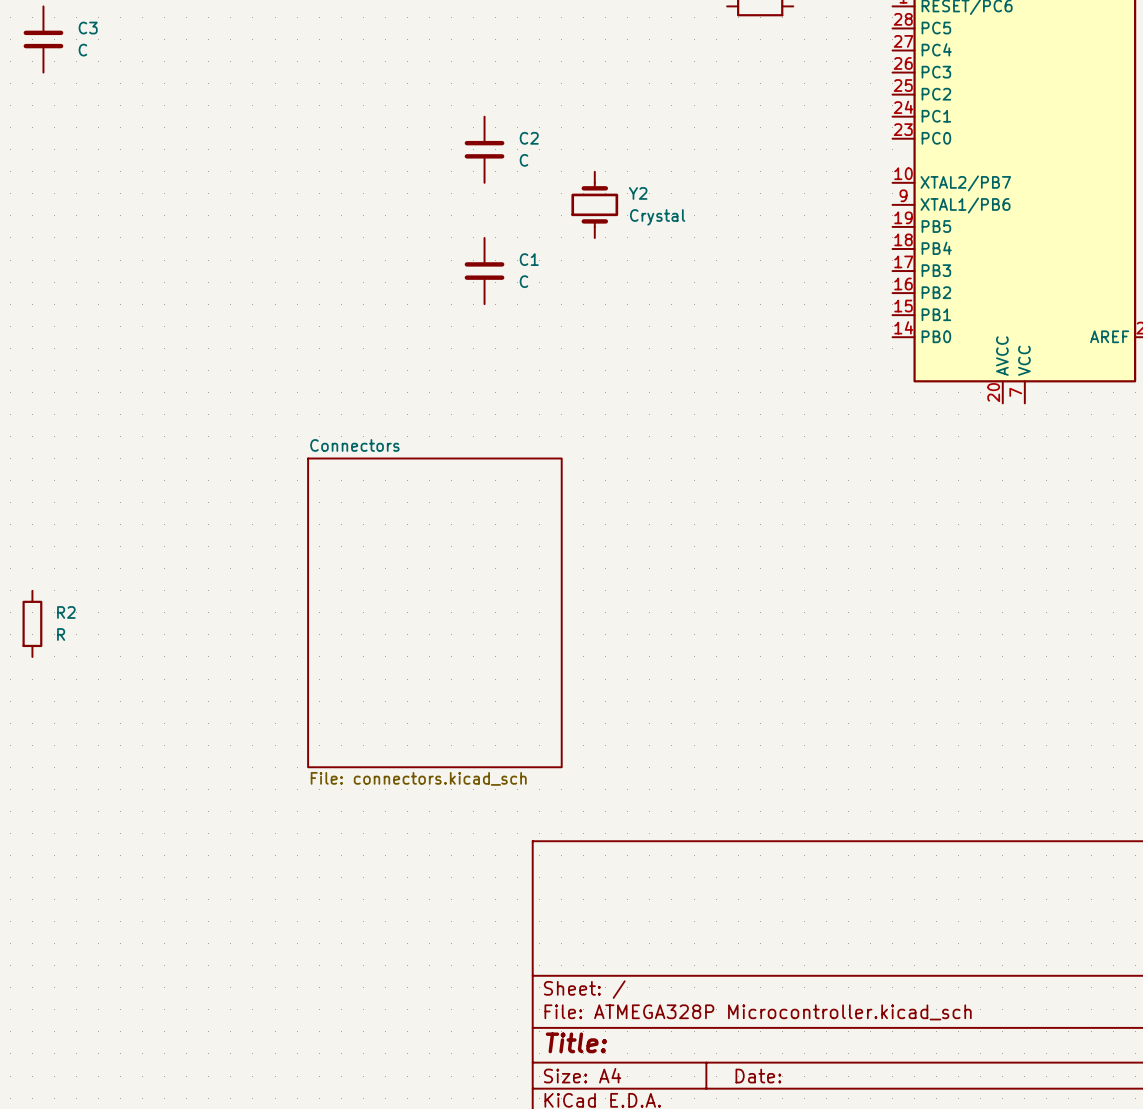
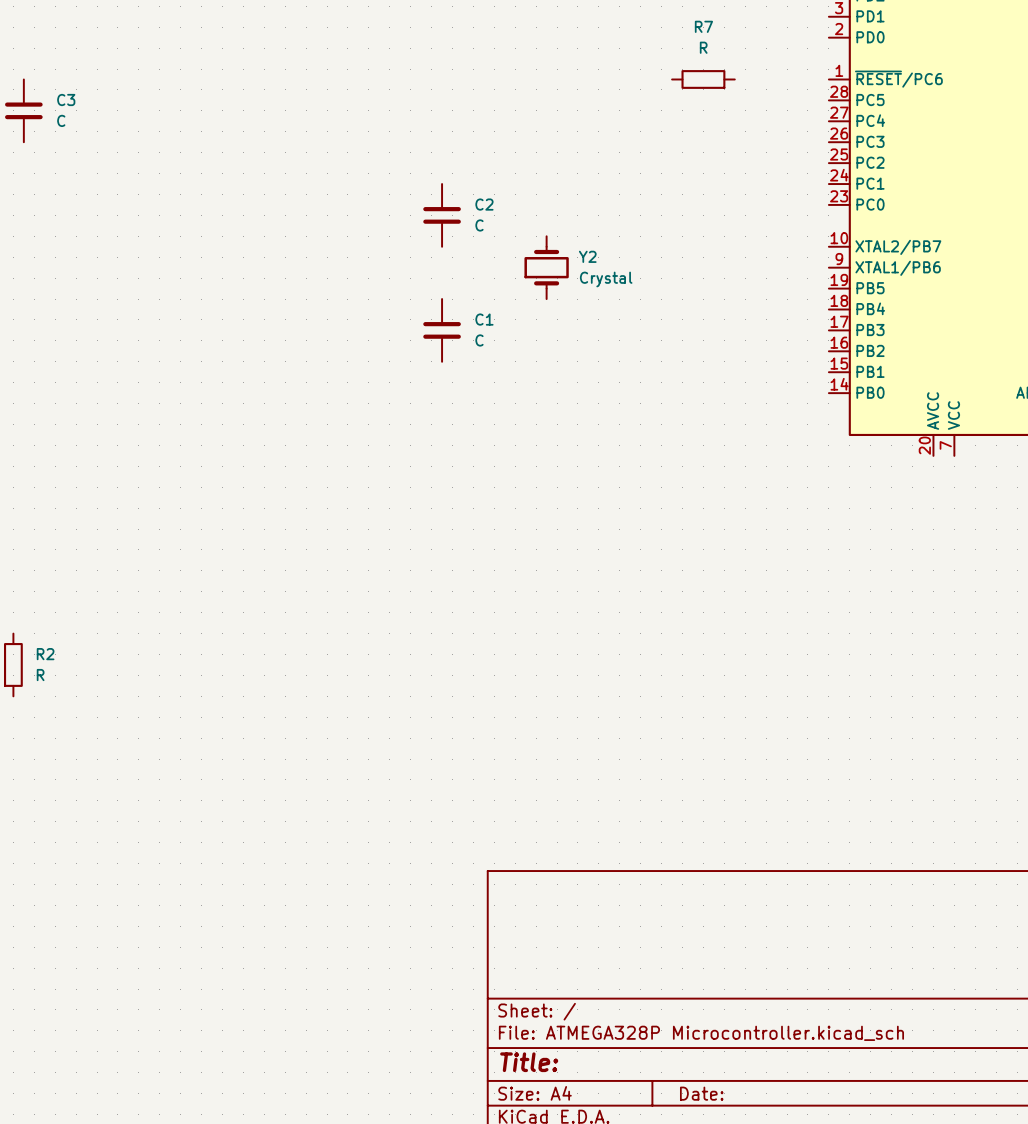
sheet Connectors: File: connectors.kicad_sch (434, 612) -> none

